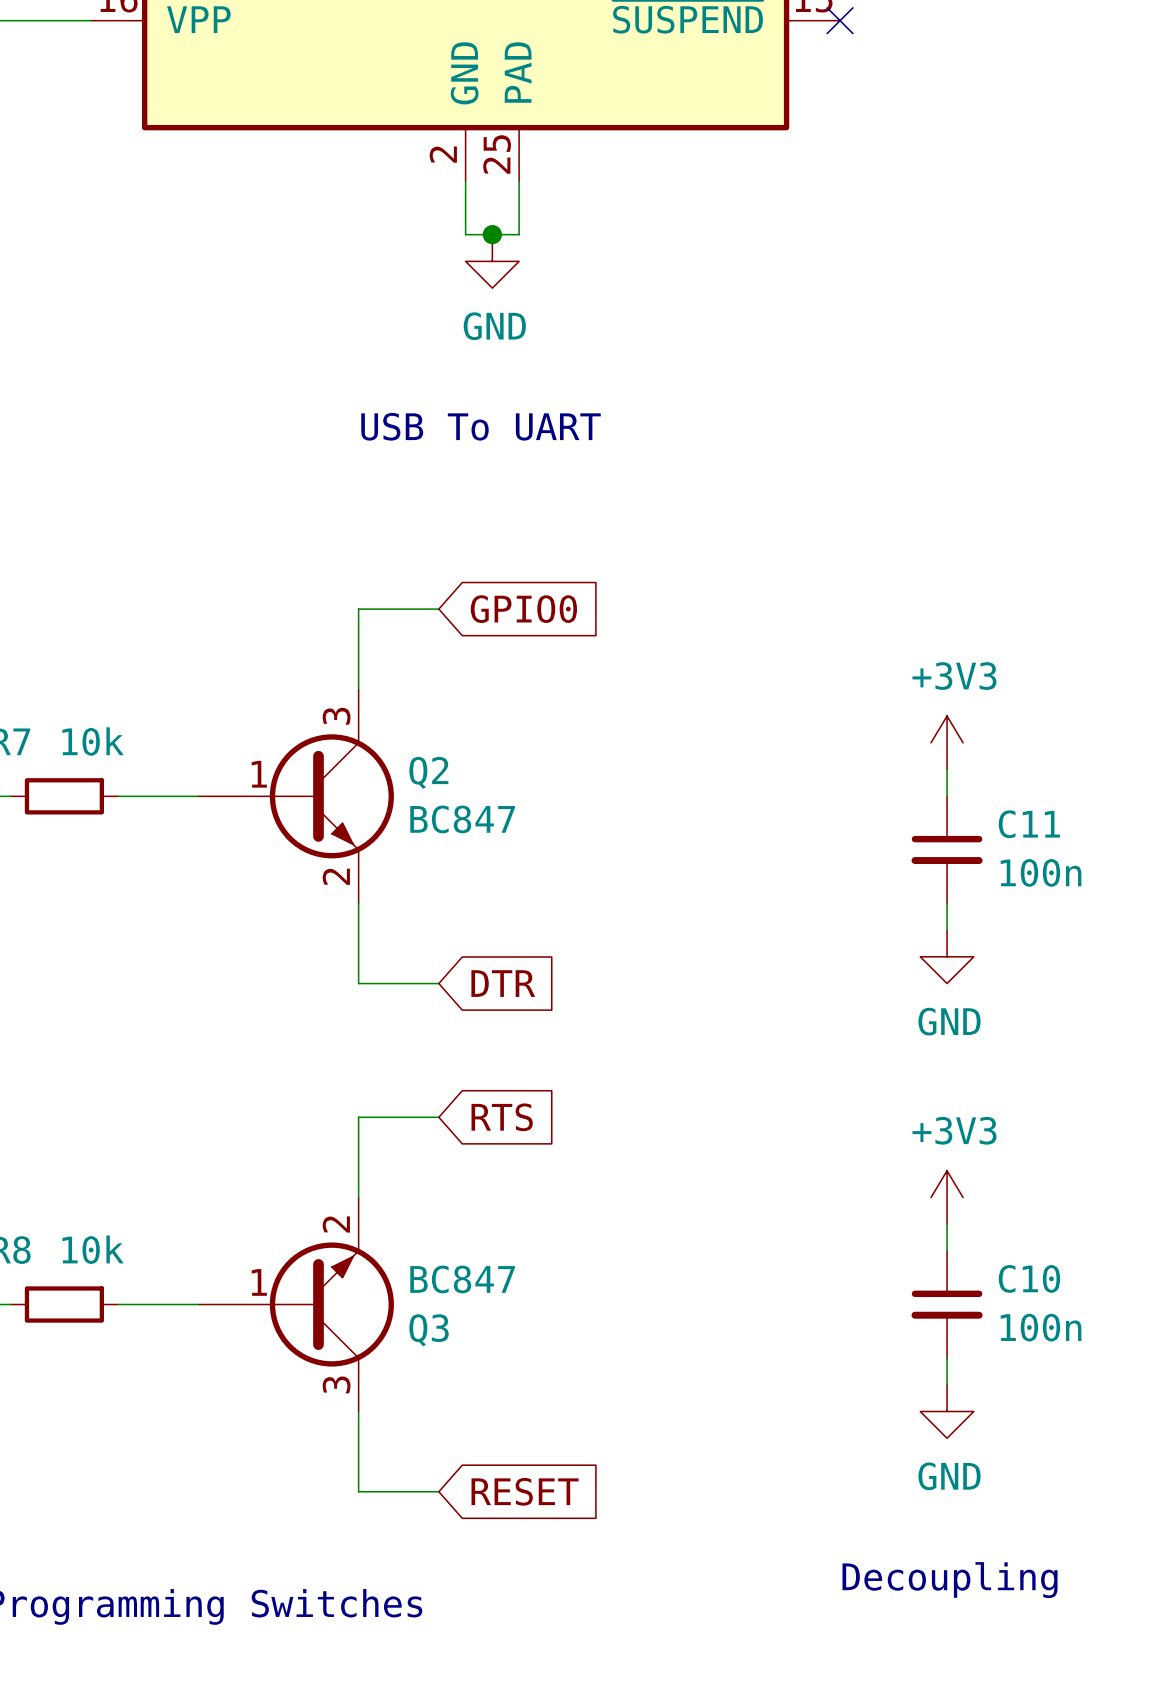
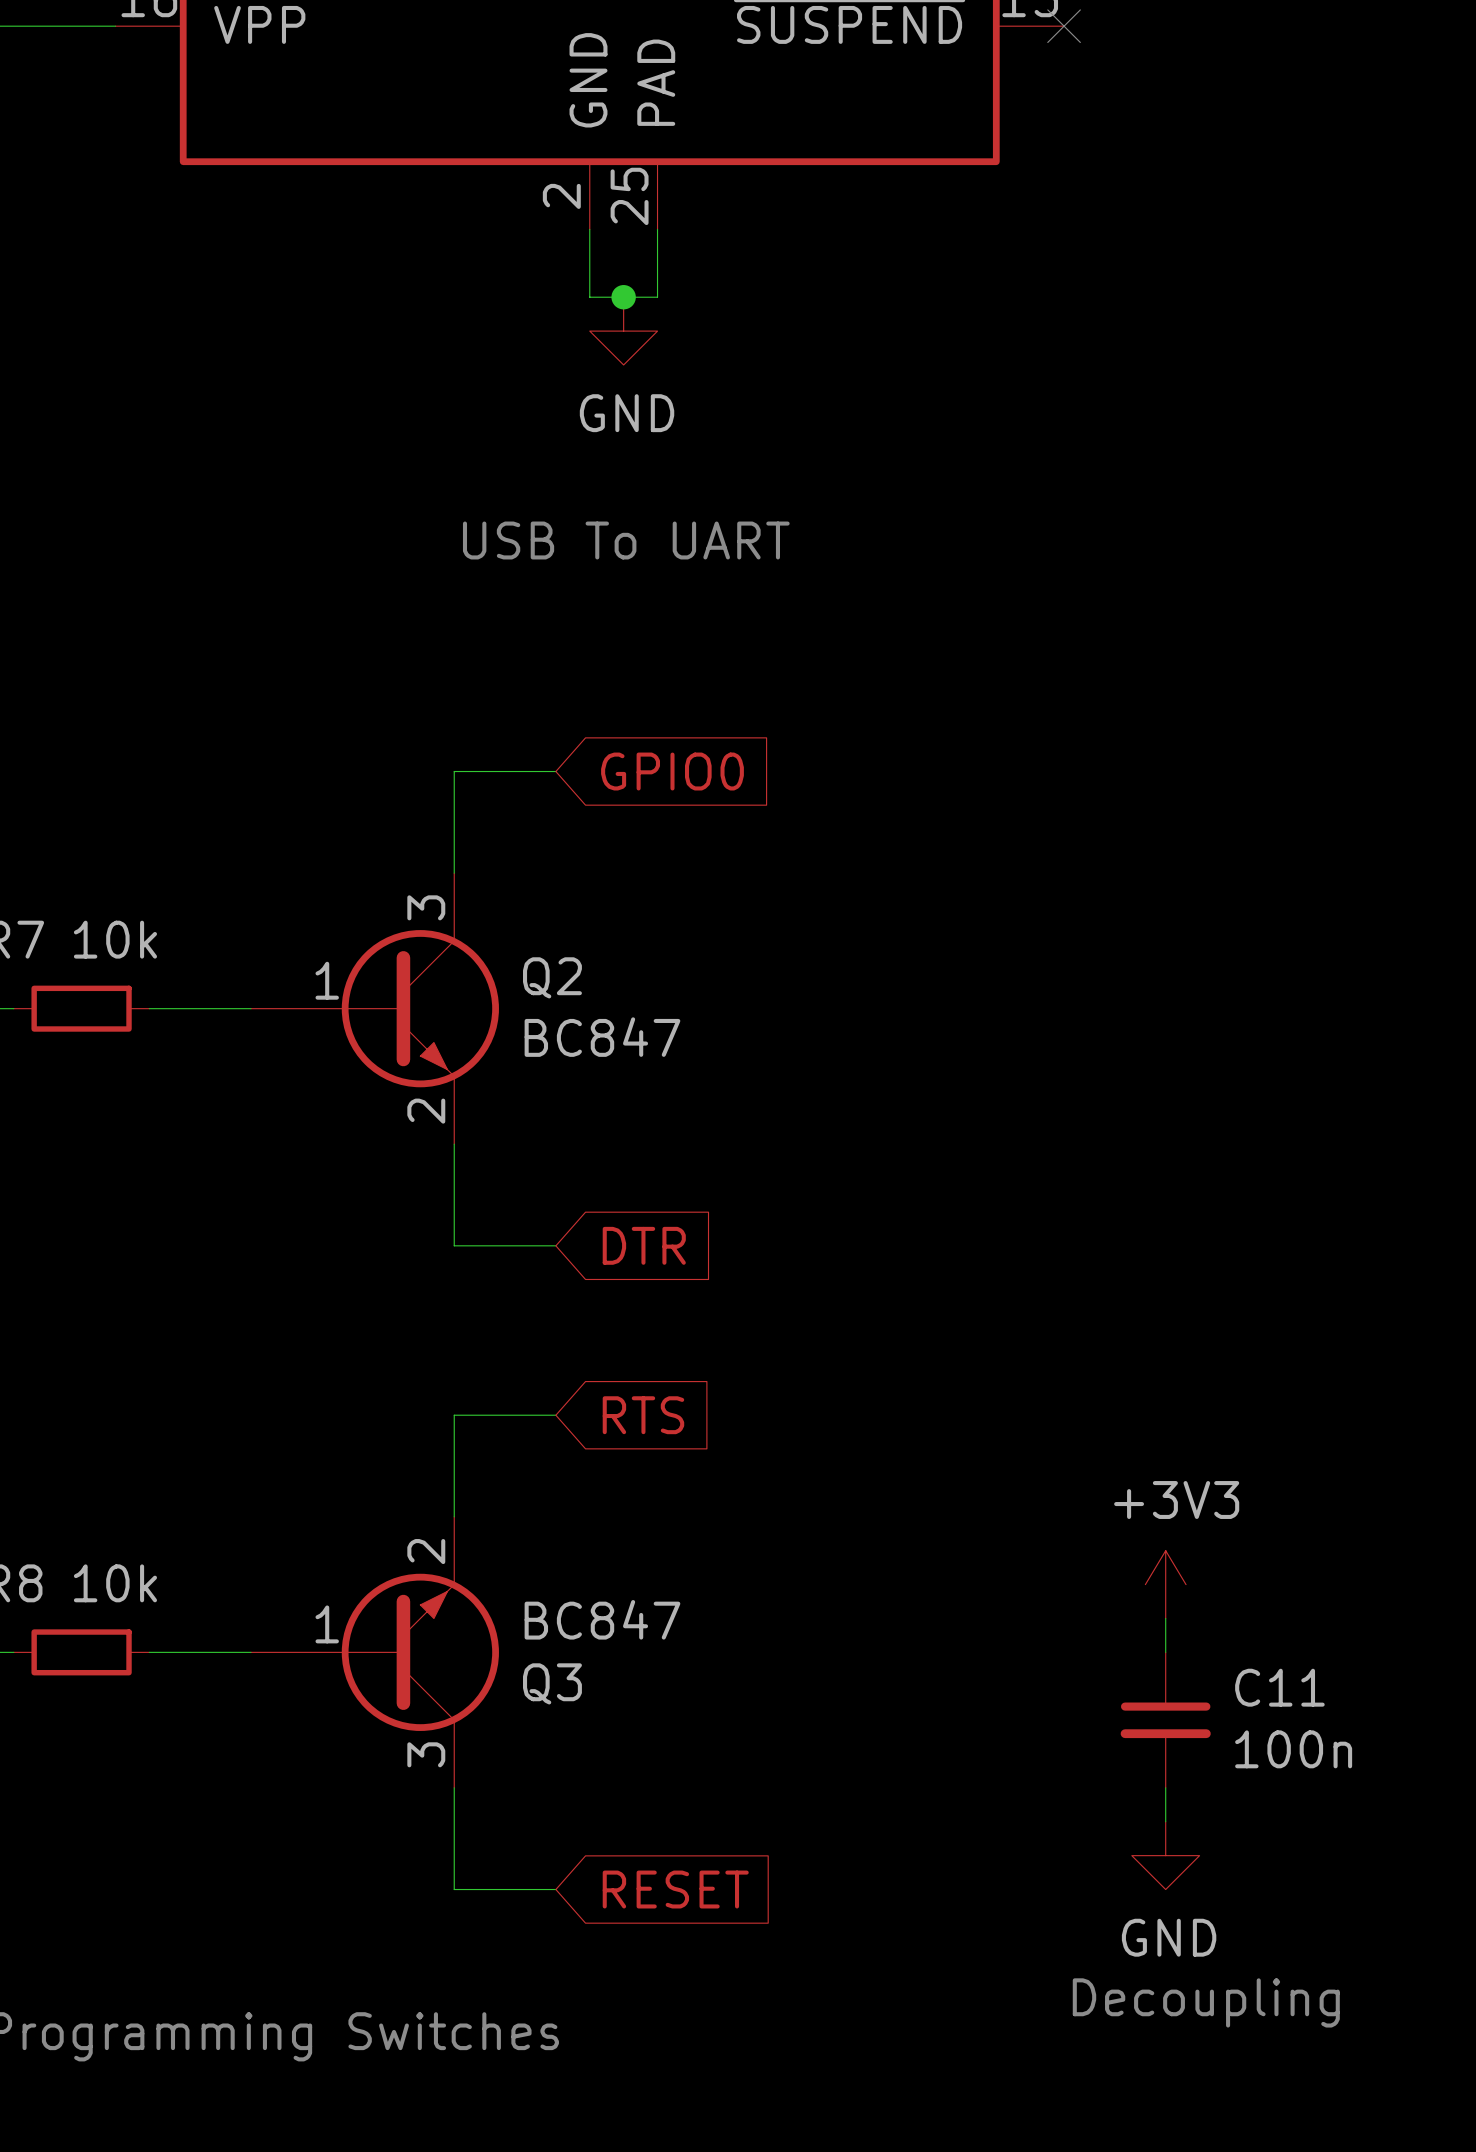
power symbol: +3V3 (947, 742) -> none
wire: (947, 769) (947, 796) -> none
C11 position: (947, 849) -> (1165, 1720)
wire: (947, 903) (947, 930) -> none
power symbol: GND (947, 956) -> none
power symbol position: +3V3 (947, 1197) -> +3V3 (1165, 1584)
wire: (947, 1224) (947, 1251) -> (1165, 1618) (1165, 1652)
C10: 100n (947, 1304) -> none
wire: (947, 1358) (947, 1384) -> (1165, 1787) (1165, 1821)
power symbol position: GND (947, 1411) -> GND (1165, 1855)

